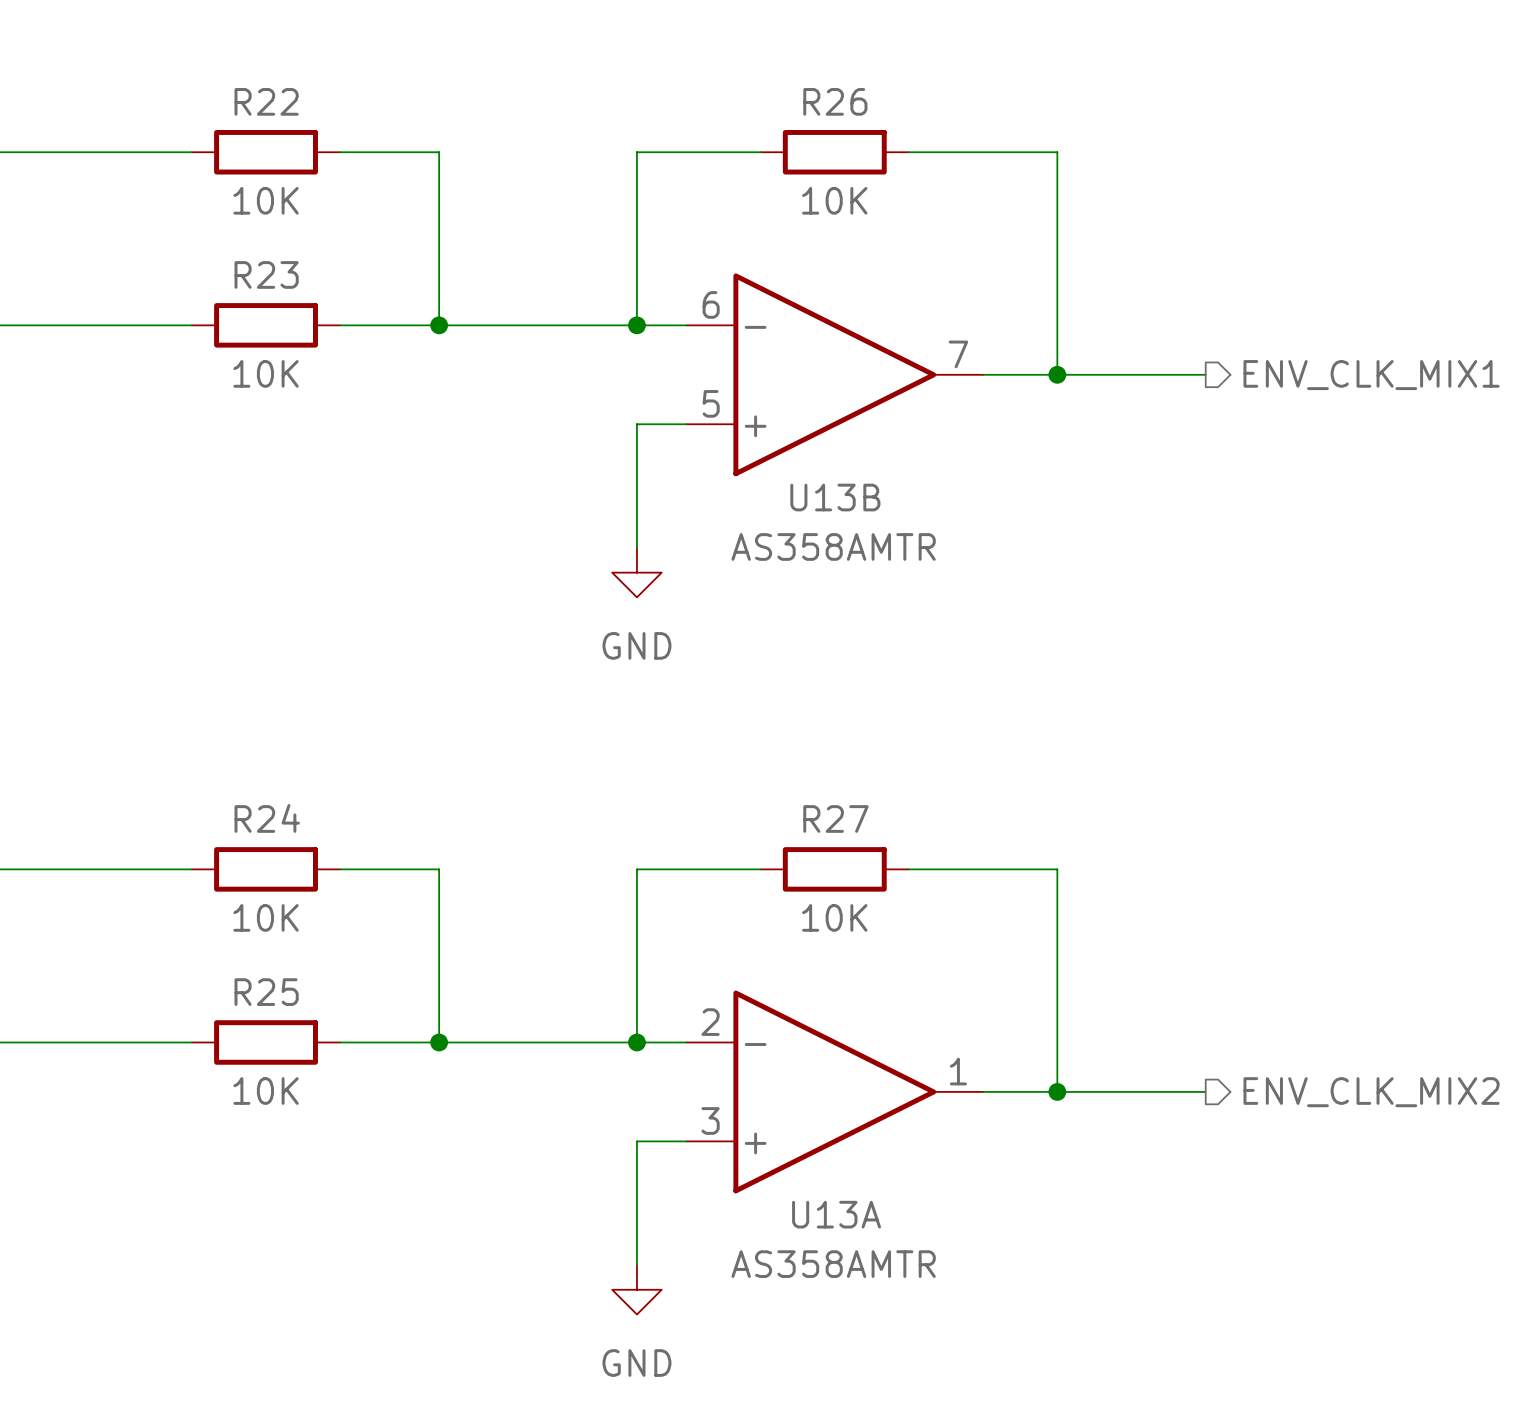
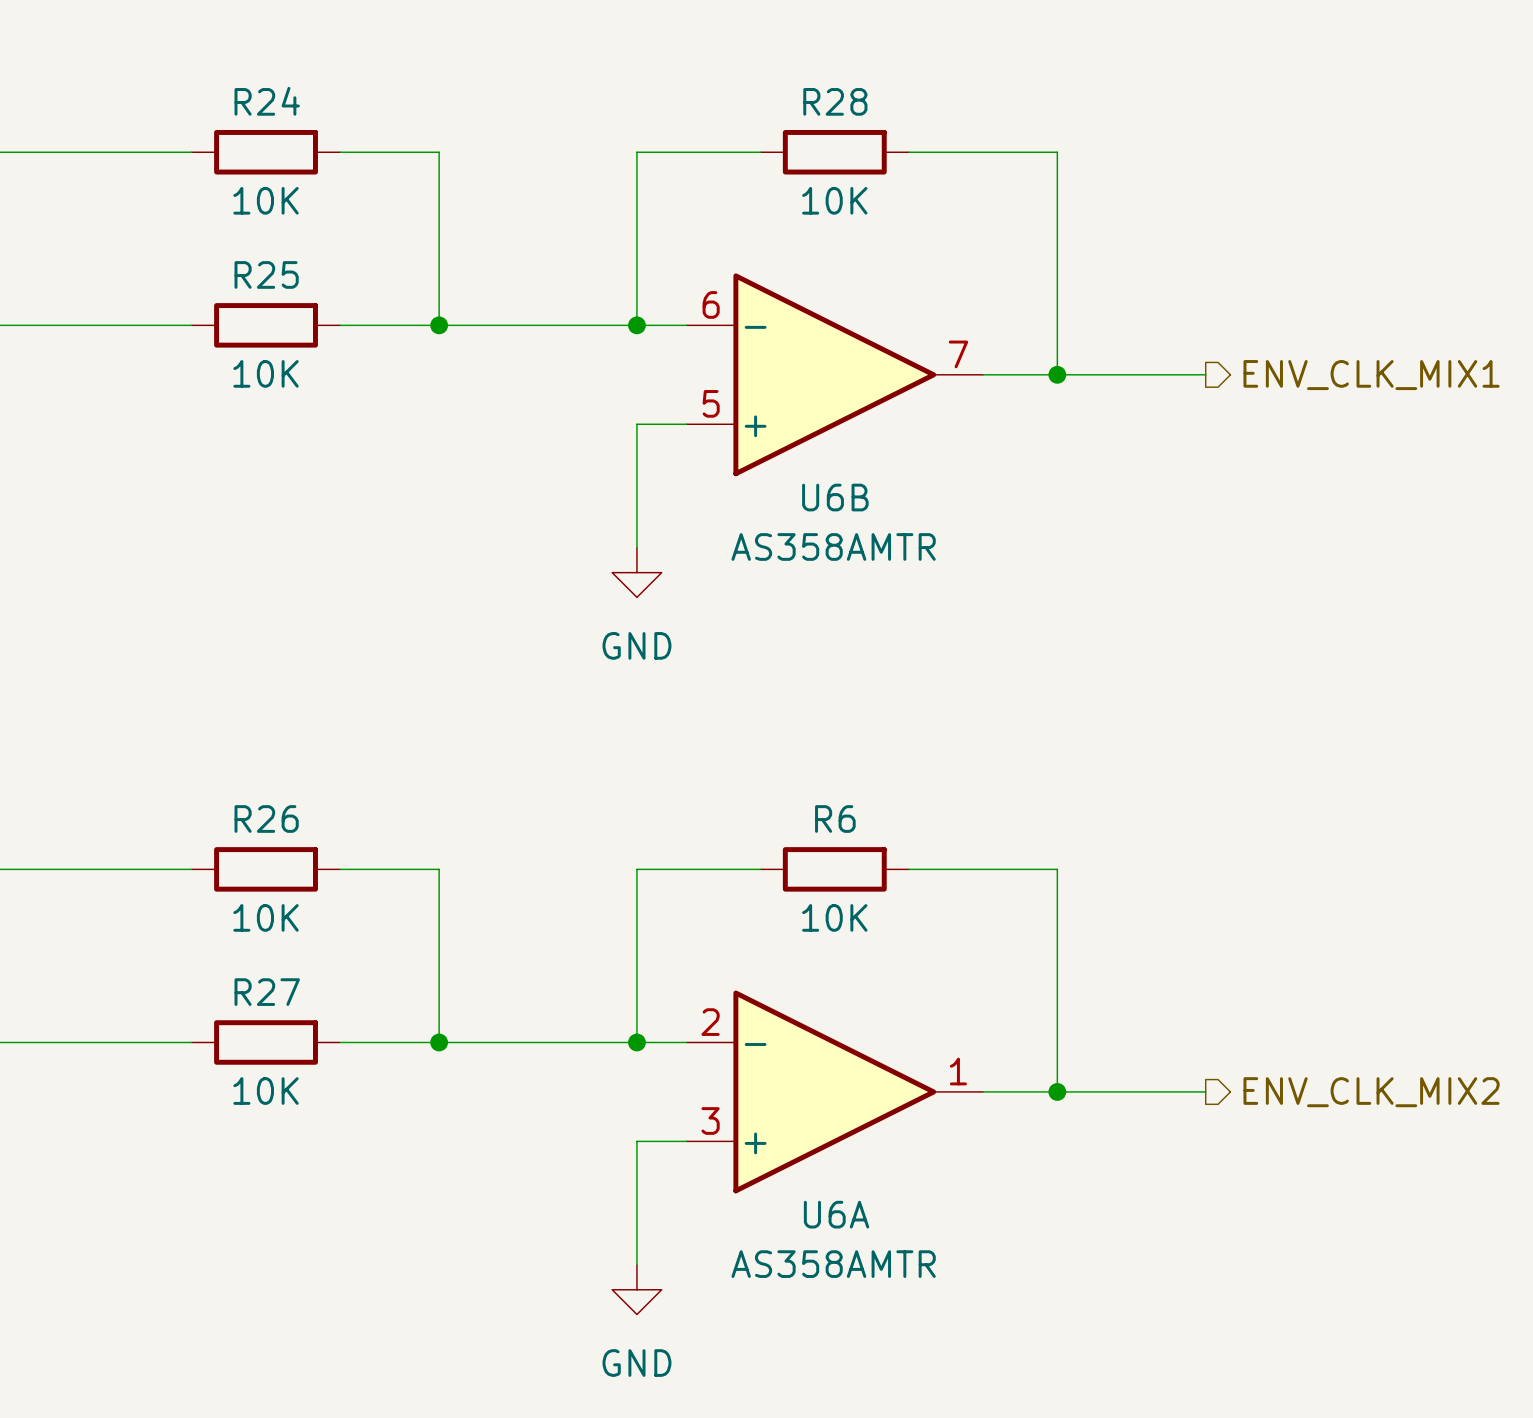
R22 name: R22 (266, 101) -> R24 (267, 101)
R26 name: R26 (835, 101) -> R28 (835, 101)
R23 name: R23 (266, 274) -> R25 (266, 274)
U13B name: U13B (835, 497) -> U6B (835, 497)
R24 name: R24 (267, 818) -> R26 (266, 819)
R27 name: R27 (835, 819) -> R6 (835, 819)
R25 name: R25 (266, 992) -> R27 (267, 992)
U13A name: U13A (836, 1214) -> U6A (836, 1214)

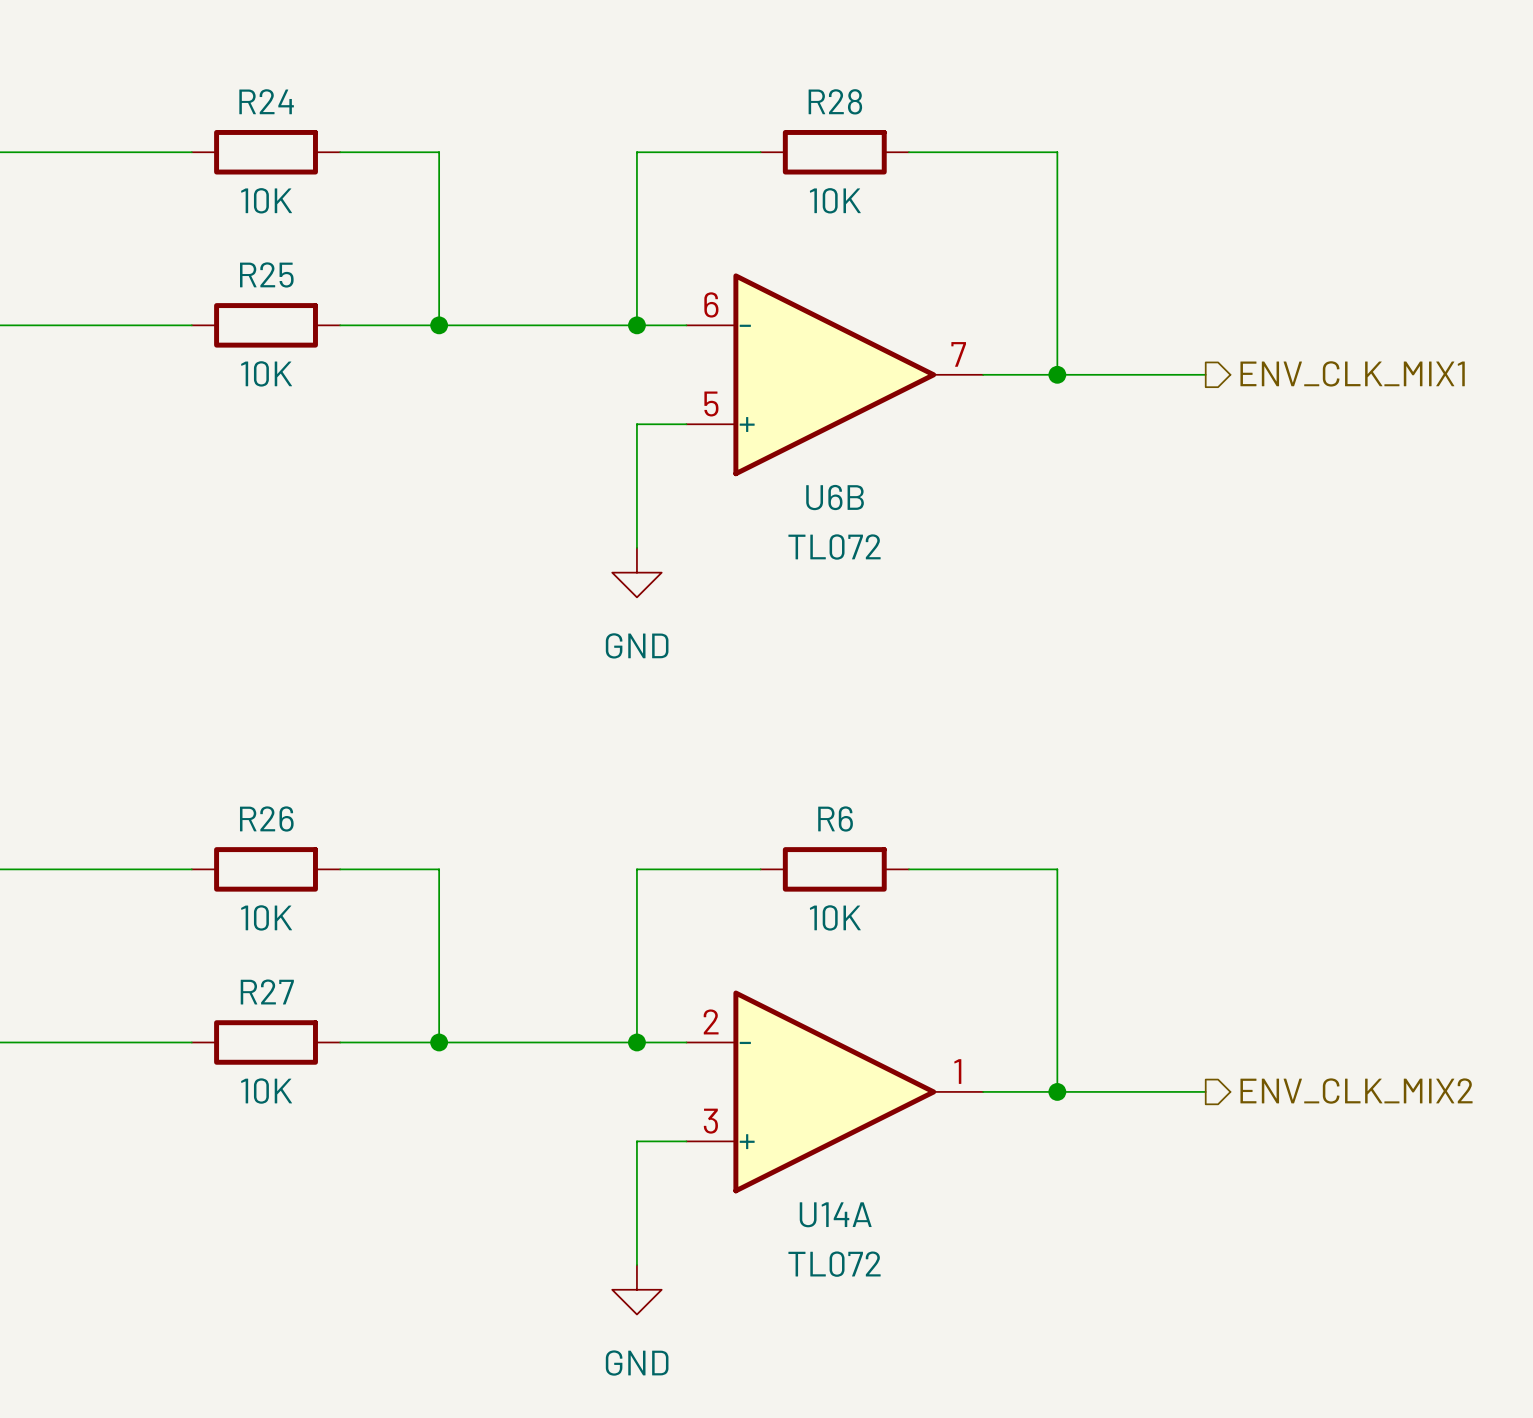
U6B value: AS358AMTR (833, 546) -> TL072 (834, 547)
U6A name: U6A (836, 1214) -> U14A (835, 1214)
U6A value: AS358AMTR (833, 1264) -> TL072 (834, 1264)

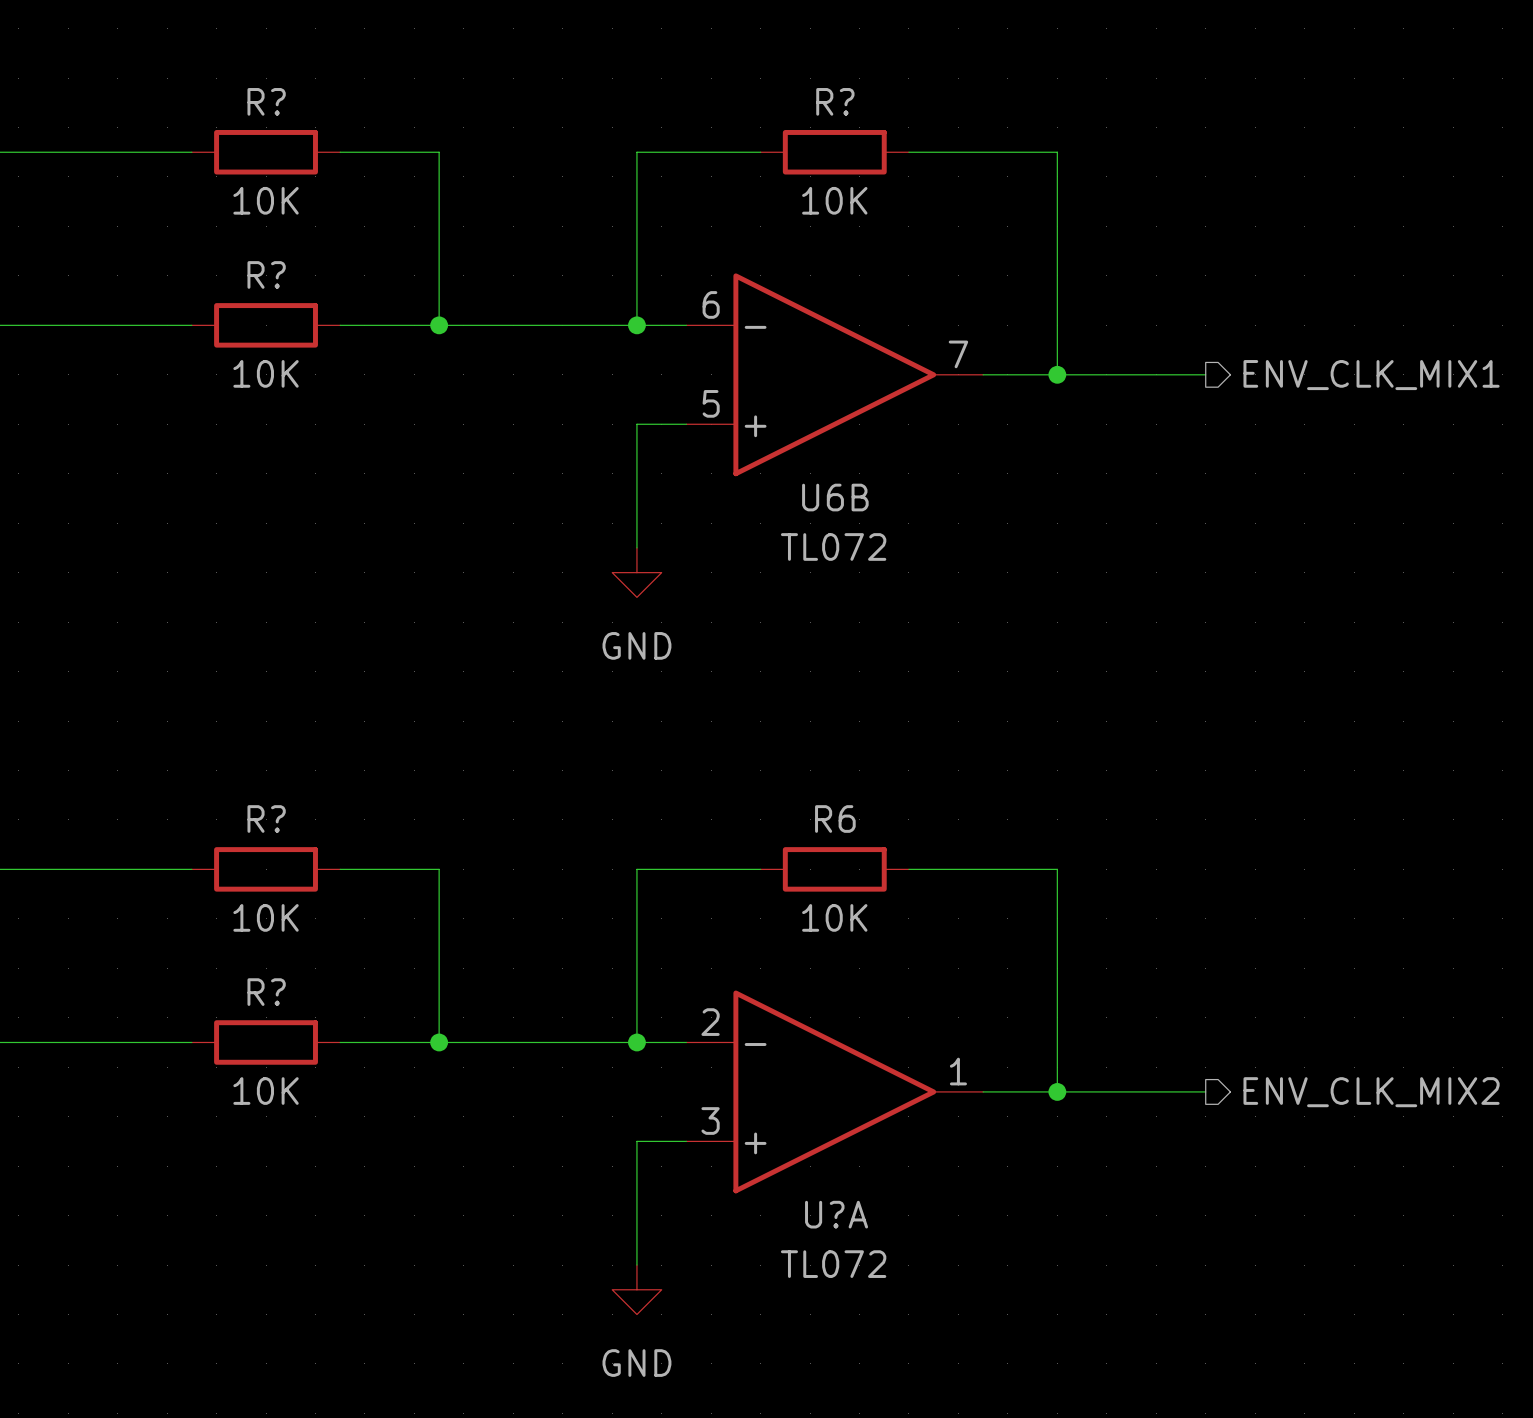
R24 name: R24 (266, 101) -> R? (266, 101)
R28 name: R28 (835, 101) -> R? (835, 101)
R25 name: R25 (266, 274) -> R? (266, 274)
R26 name: R26 (266, 818) -> R? (266, 819)
R27 name: R27 (267, 991) -> R? (266, 992)
U14A name: U14A (835, 1214) -> U?A (836, 1214)

